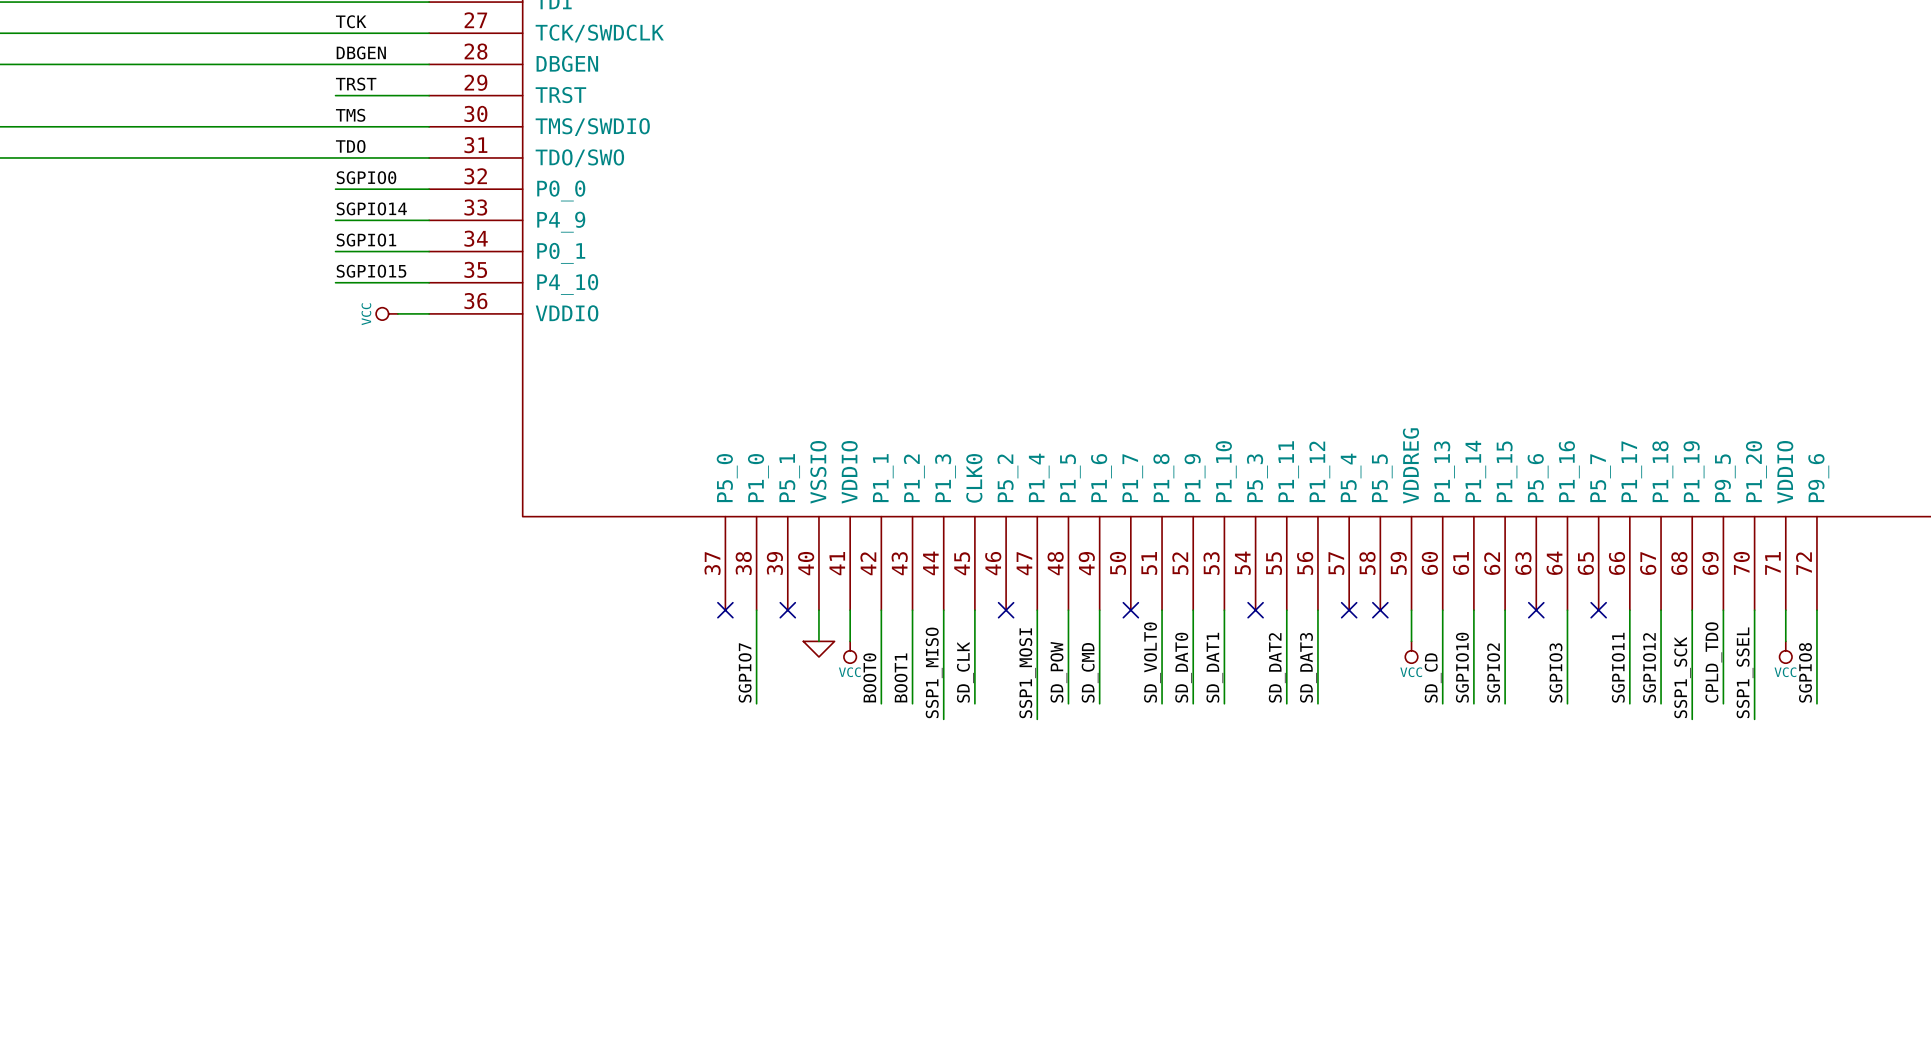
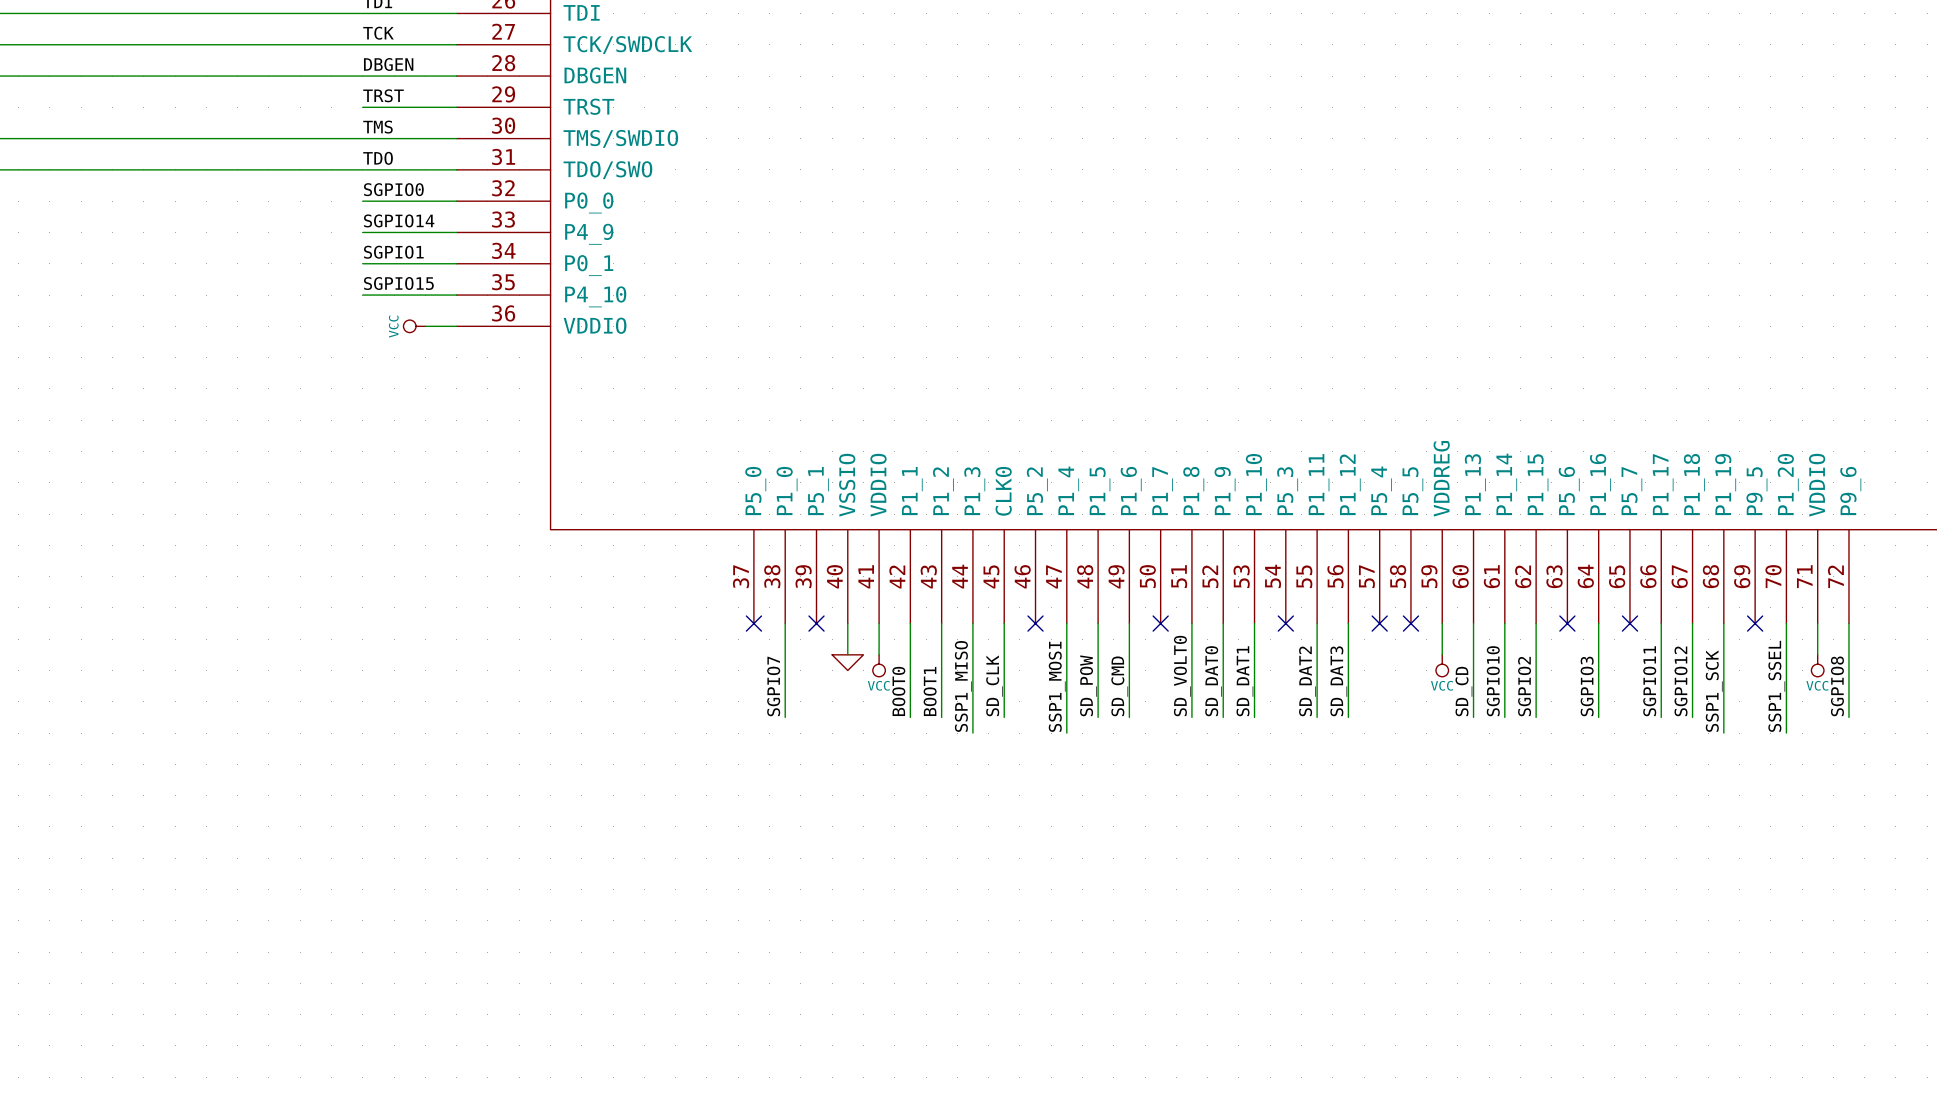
wire: (1723, 610) (1723, 703) -> none
no-connect mark: none -> (1755, 623)
label: CPLD_TDO (1713, 662) -> none

